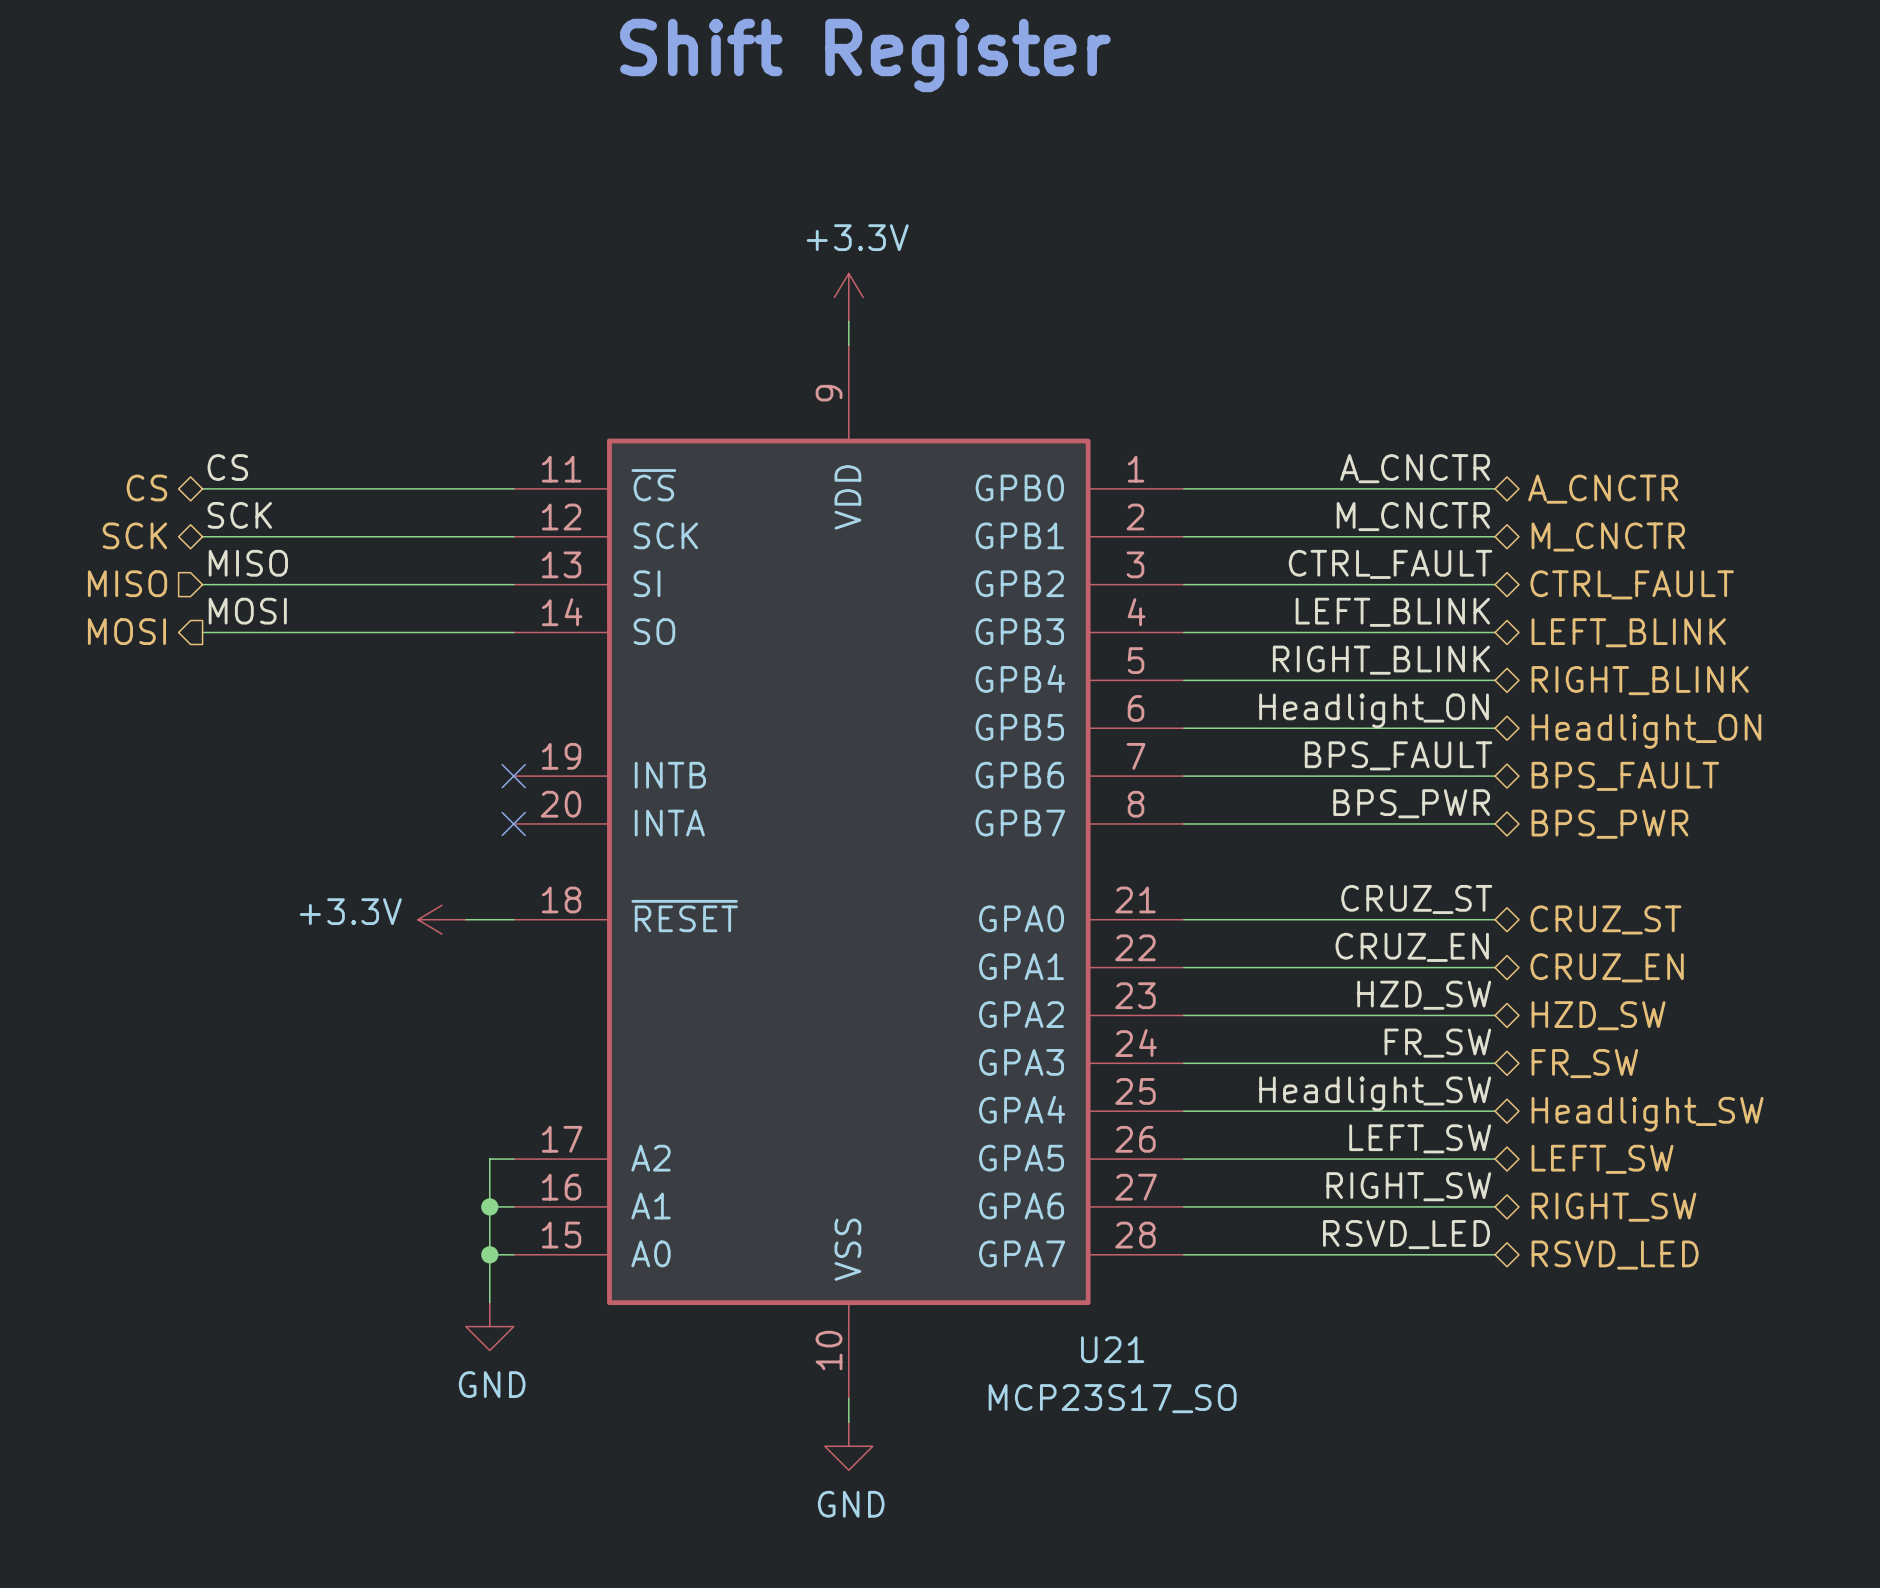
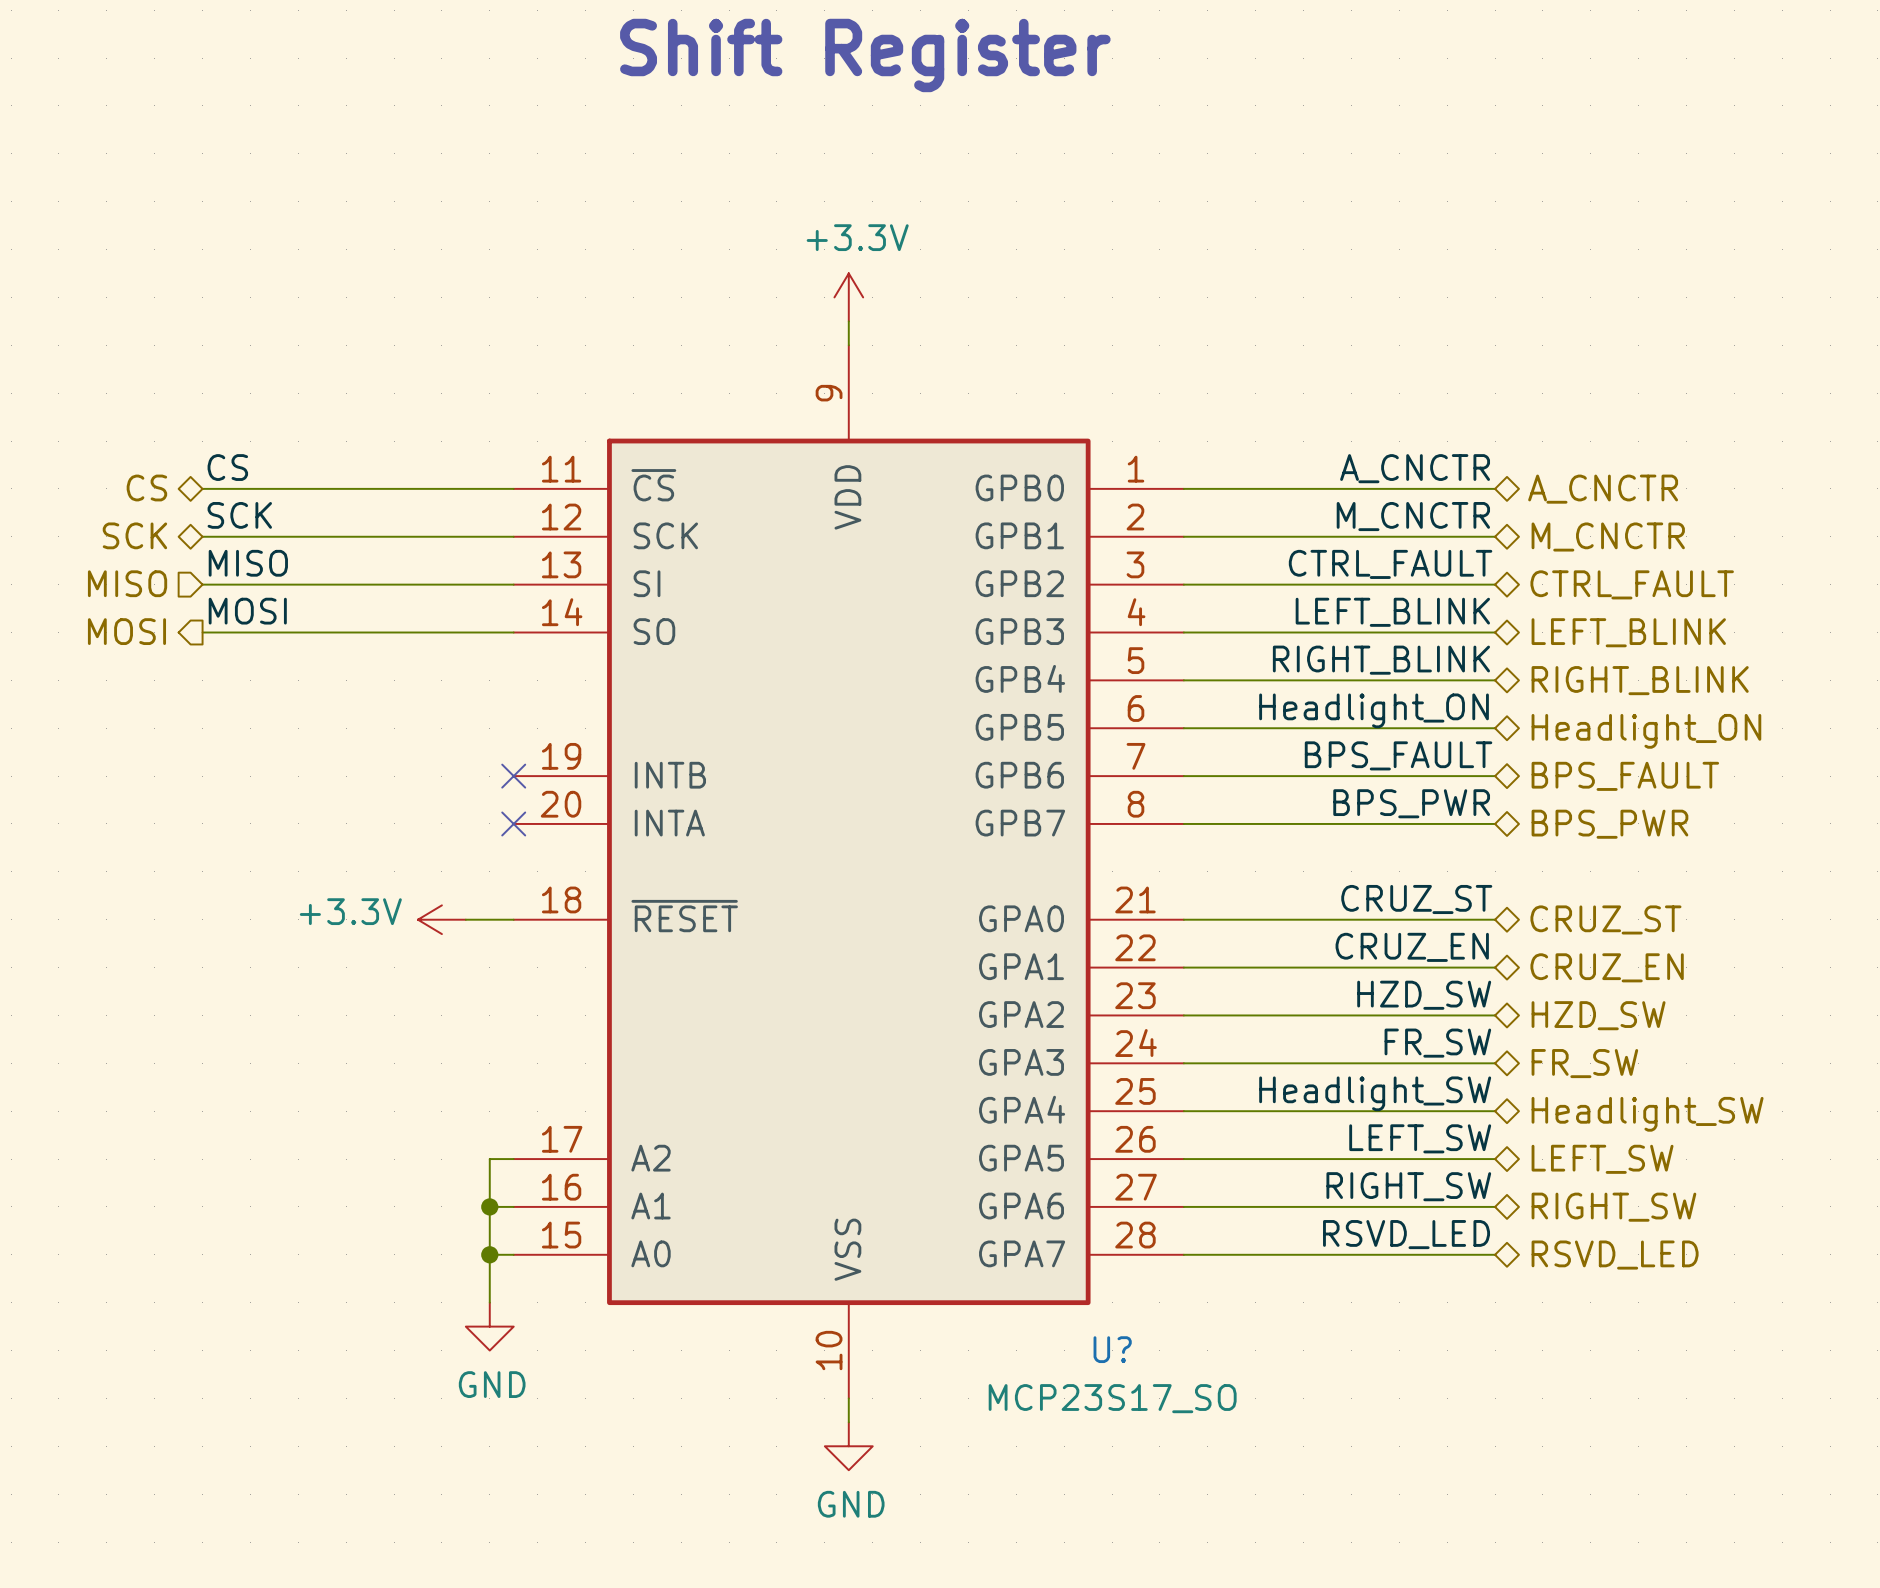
U21 name: U21 (1112, 1349) -> U? (1112, 1349)

